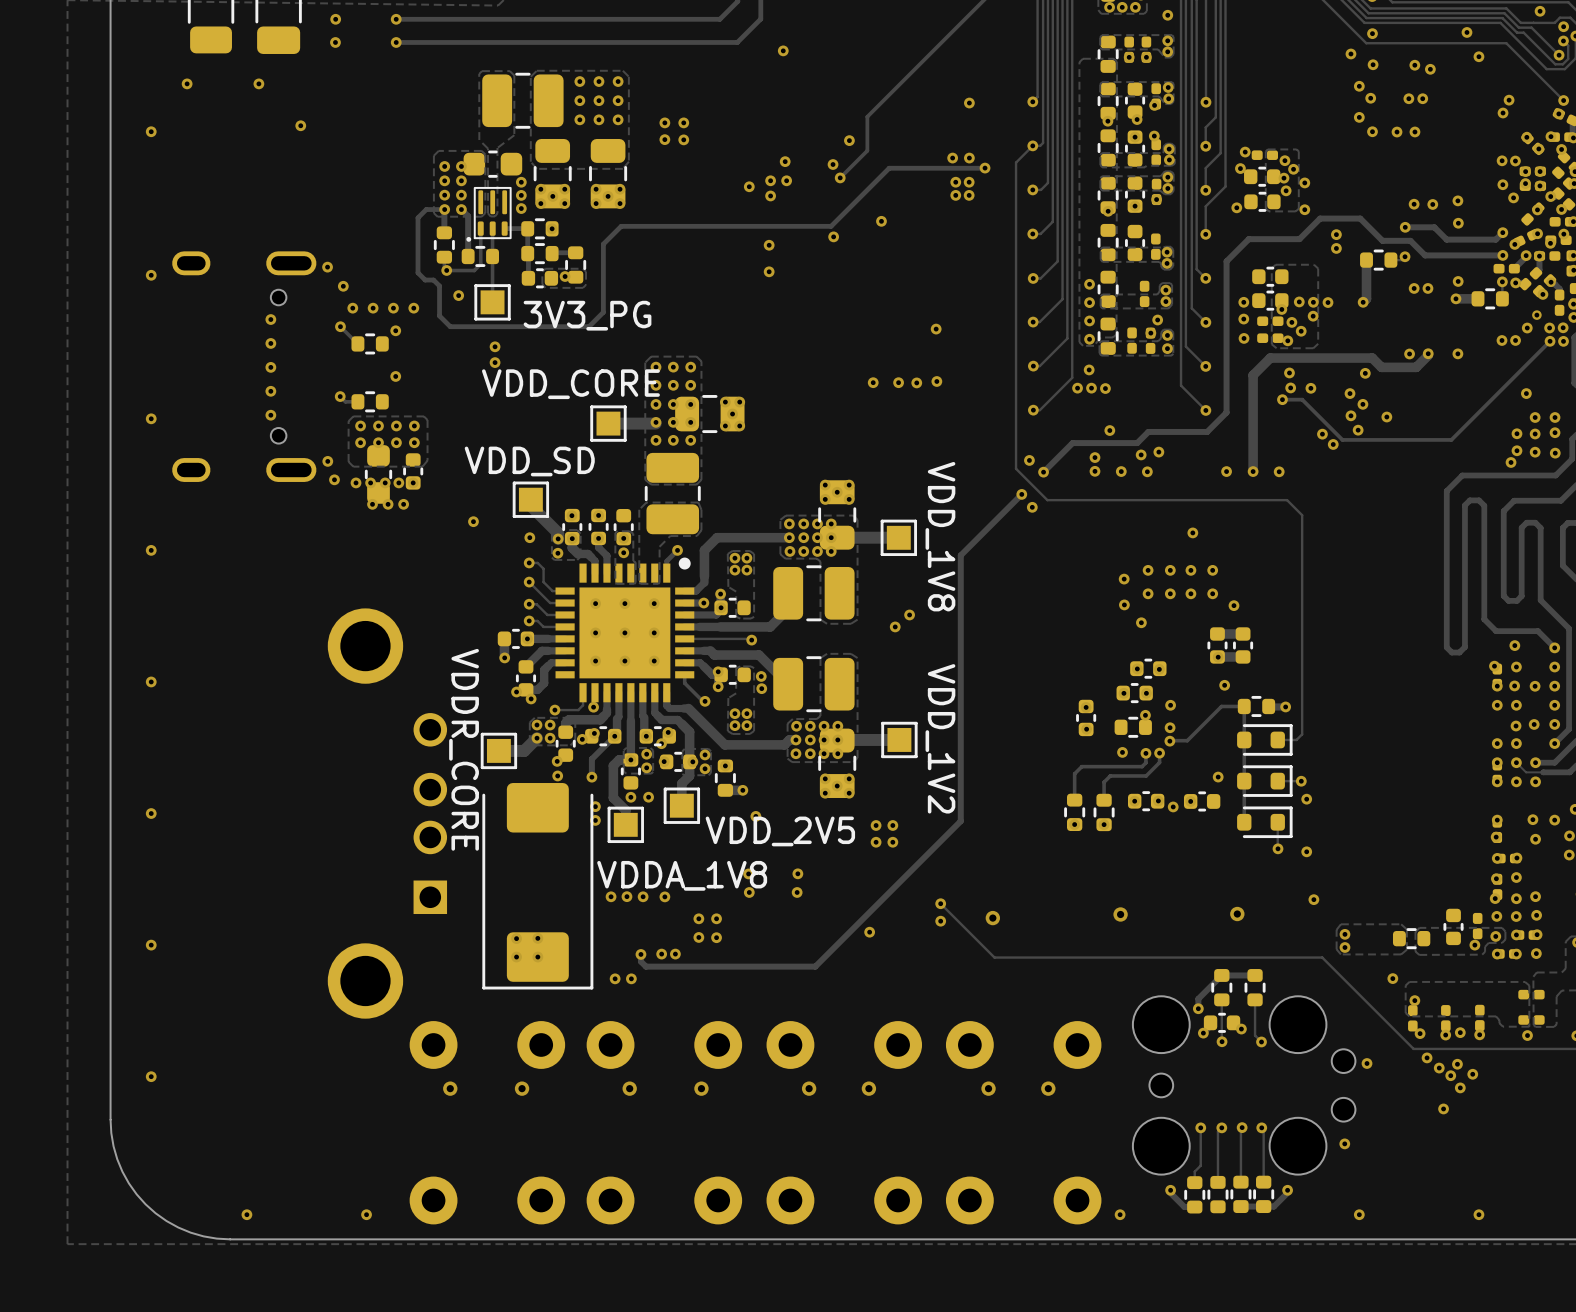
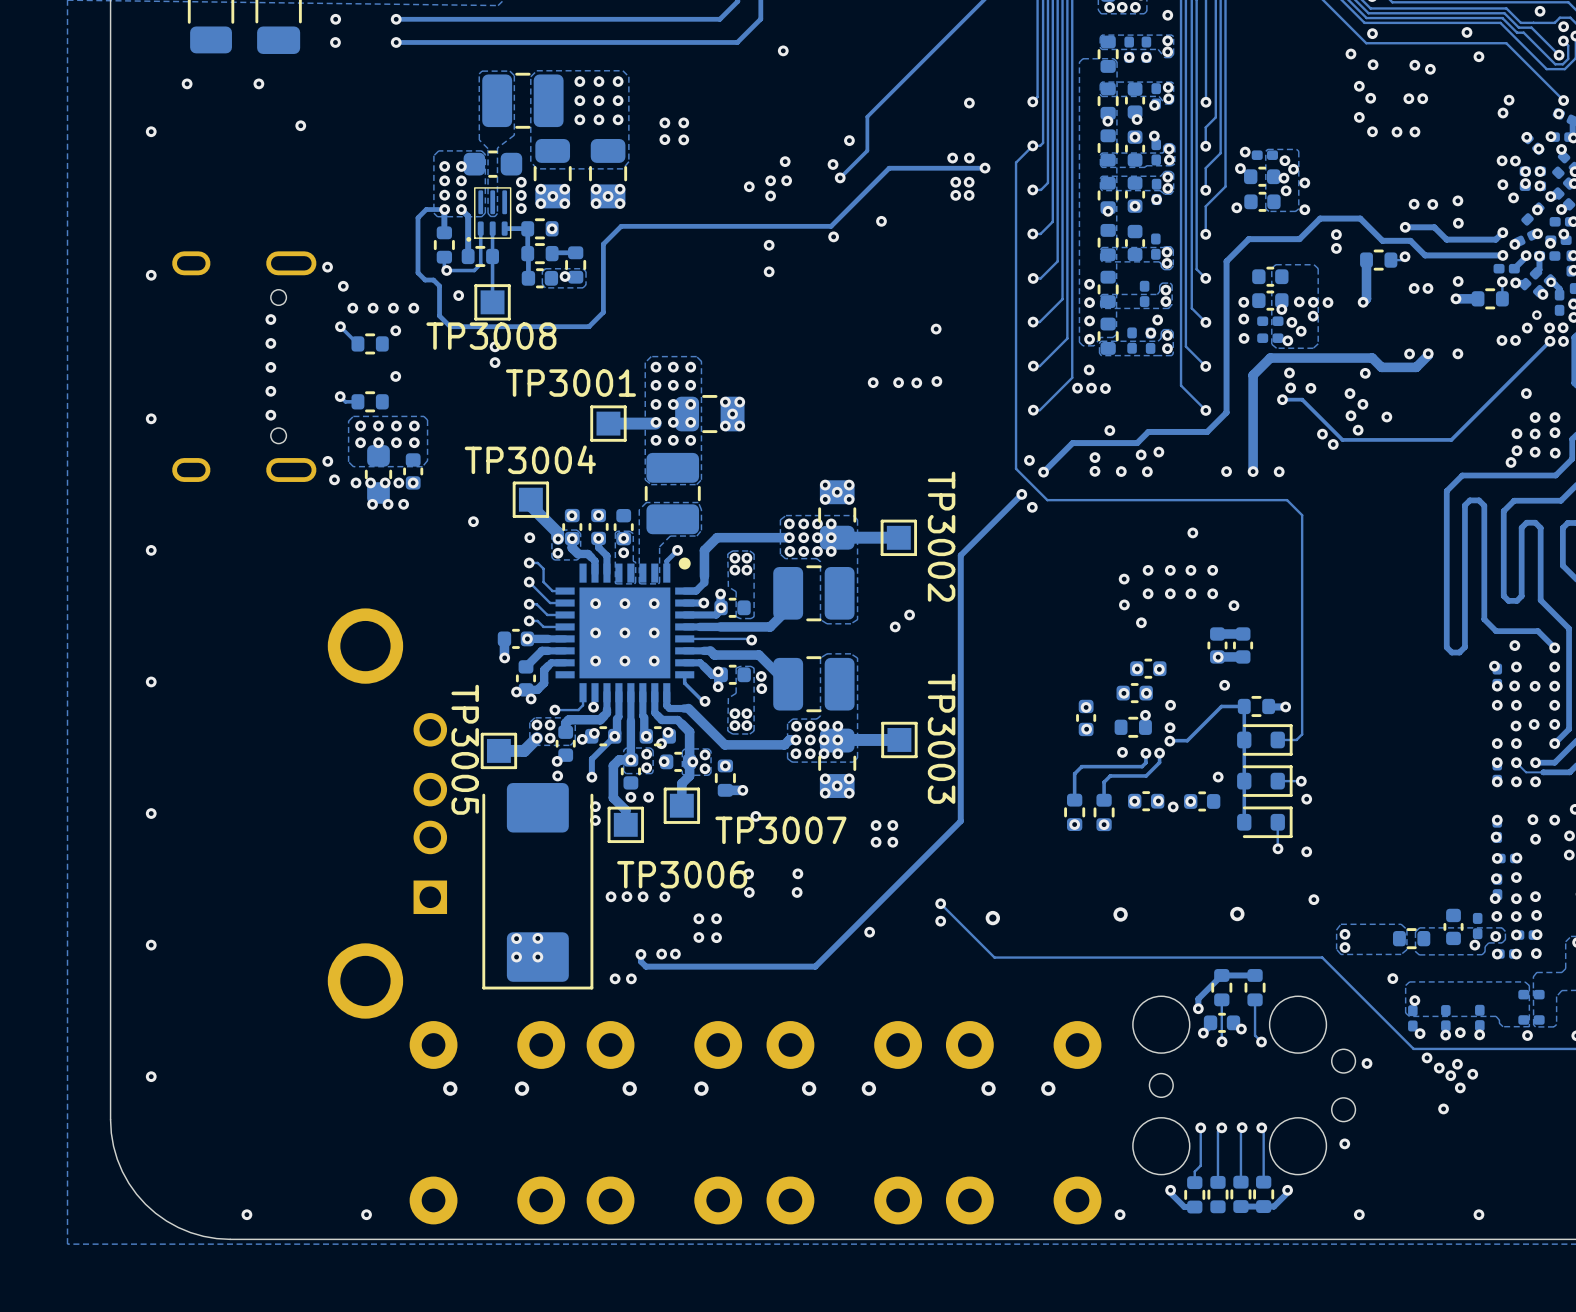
3V3_PG name: 3V3_PG (587, 315) -> TP3008 (491, 336)
VDD_CORE name: VDD_CORE (570, 384) -> TP3001 (570, 383)
VDD_SD name: VDD_SD (529, 461) -> TP3004 (530, 459)
VDD_1V8 name: VDD_1V8 (940, 536) -> TP3002 (941, 536)
VDD_1V2 name: VDD_1V2 (940, 738) -> TP3003 (941, 738)
VDDR_CORE name: VDDR_CORE (464, 749) -> TP3005 (465, 749)
VDD_2V5 name: VDD_2V5 (780, 831) -> TP3007 (780, 830)
VDDA_1V8 name: VDDA_1V8 (682, 875) -> TP3006 (682, 874)

